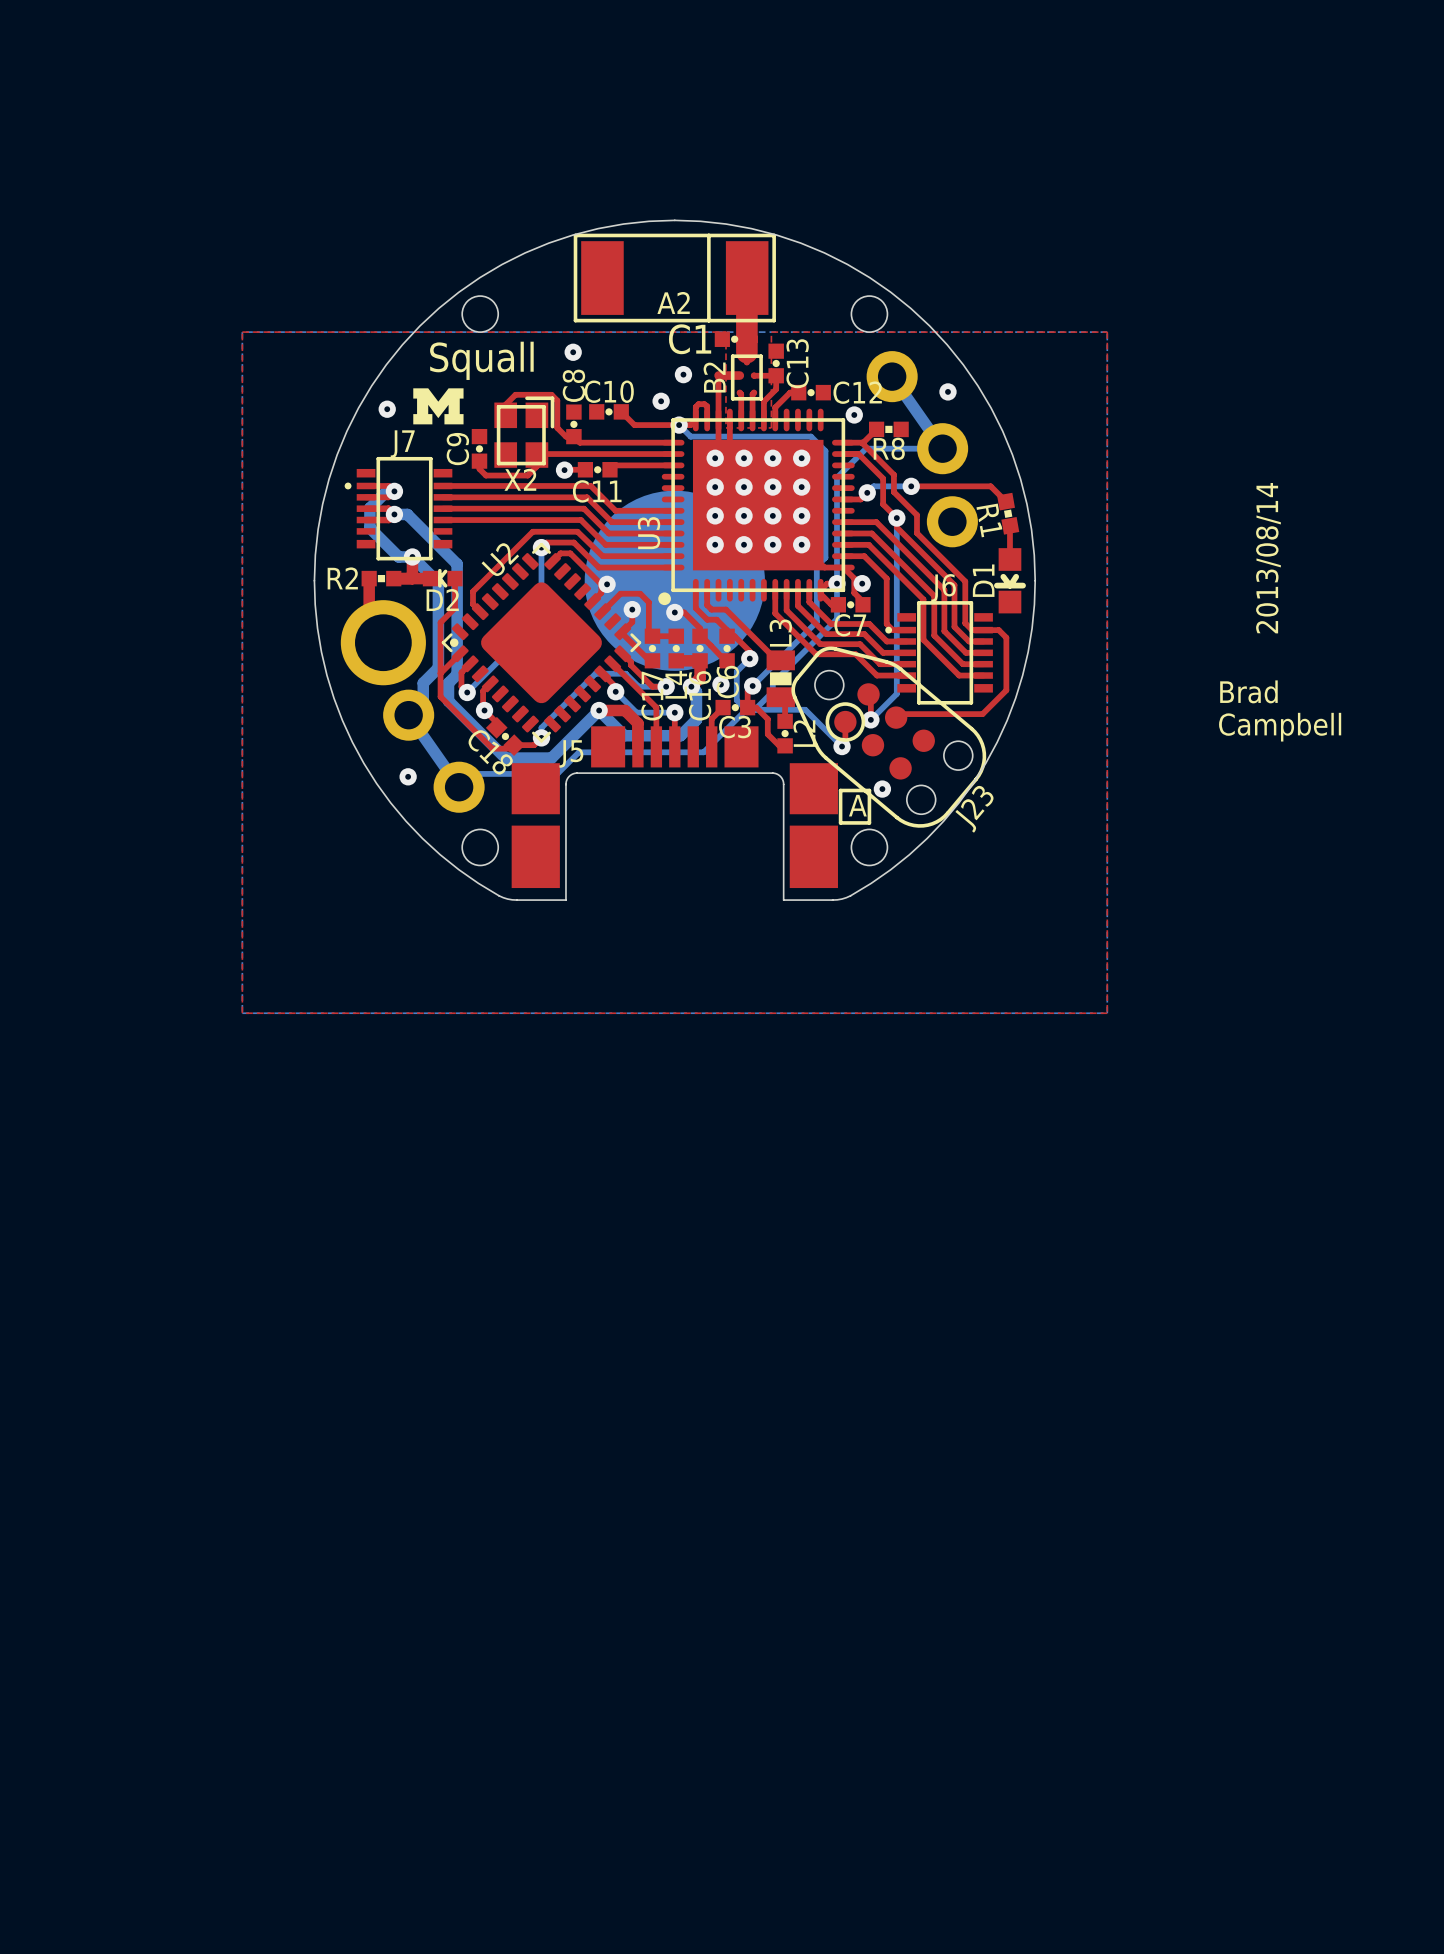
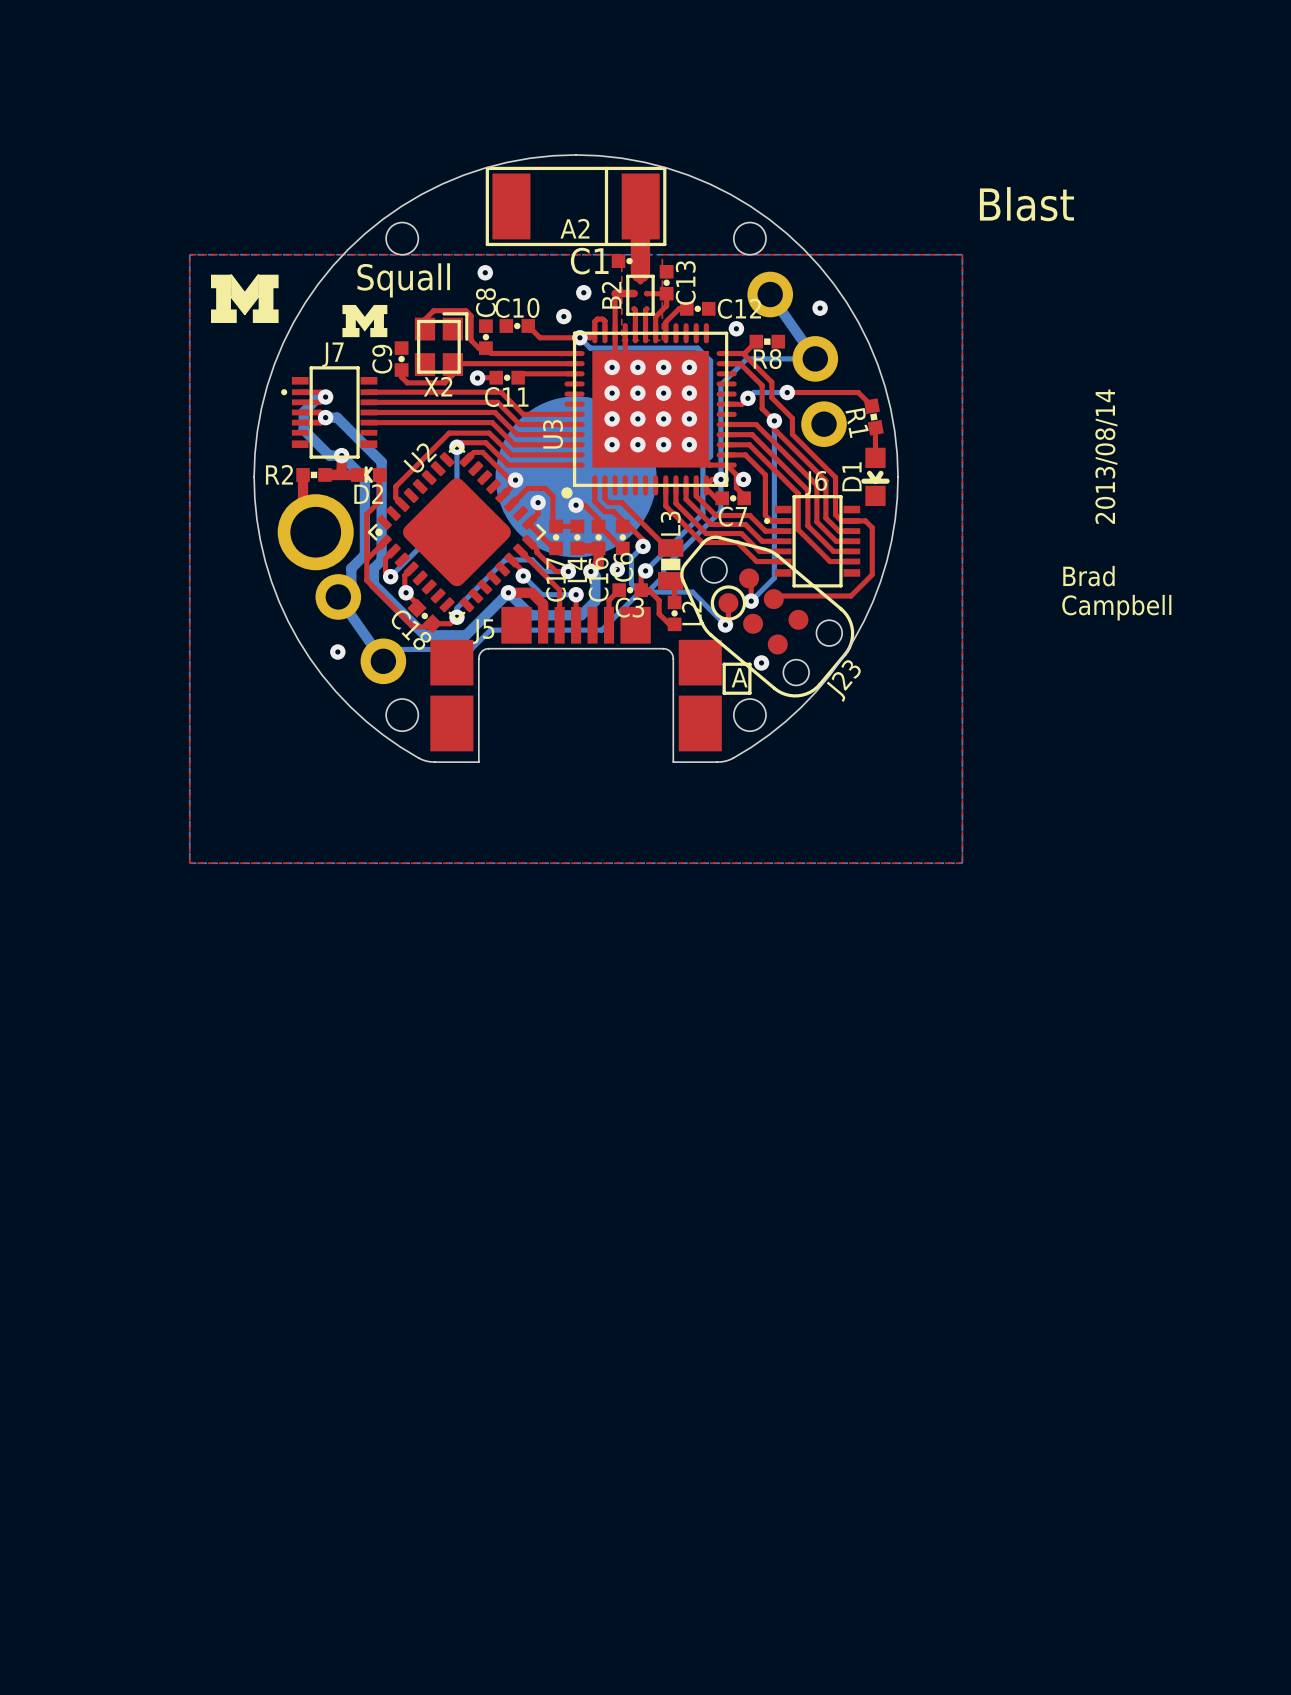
text: none -> Blast (1026, 204)
drawing: none -> [211, 274, 279, 323]
via: (387, 409) -> none

